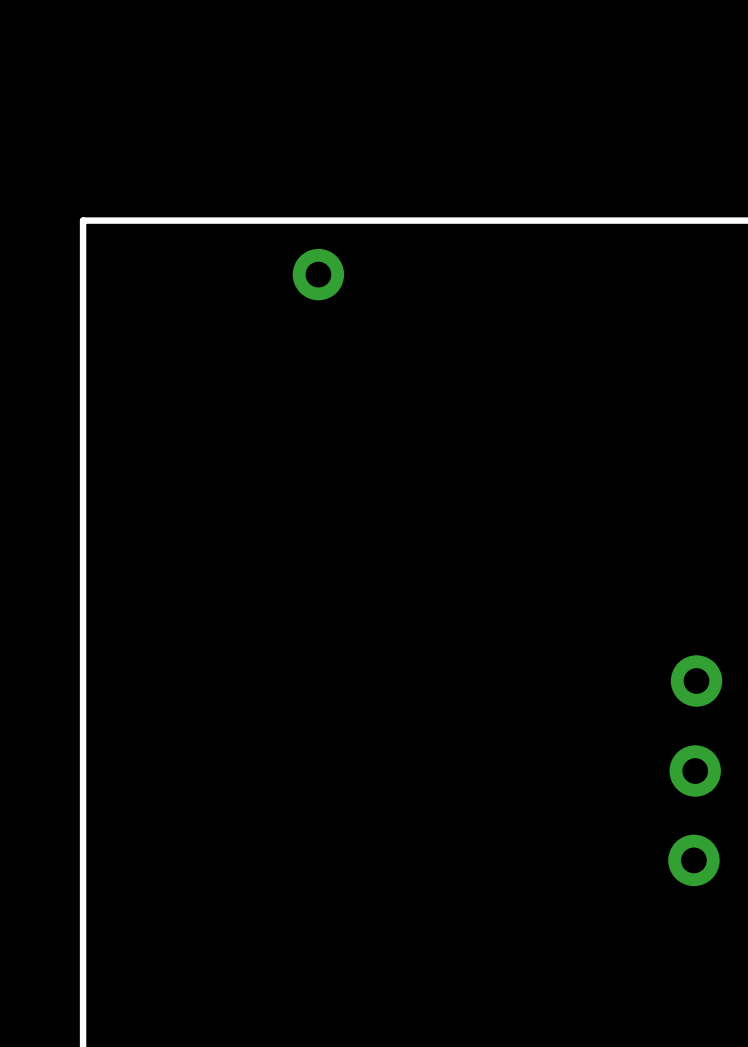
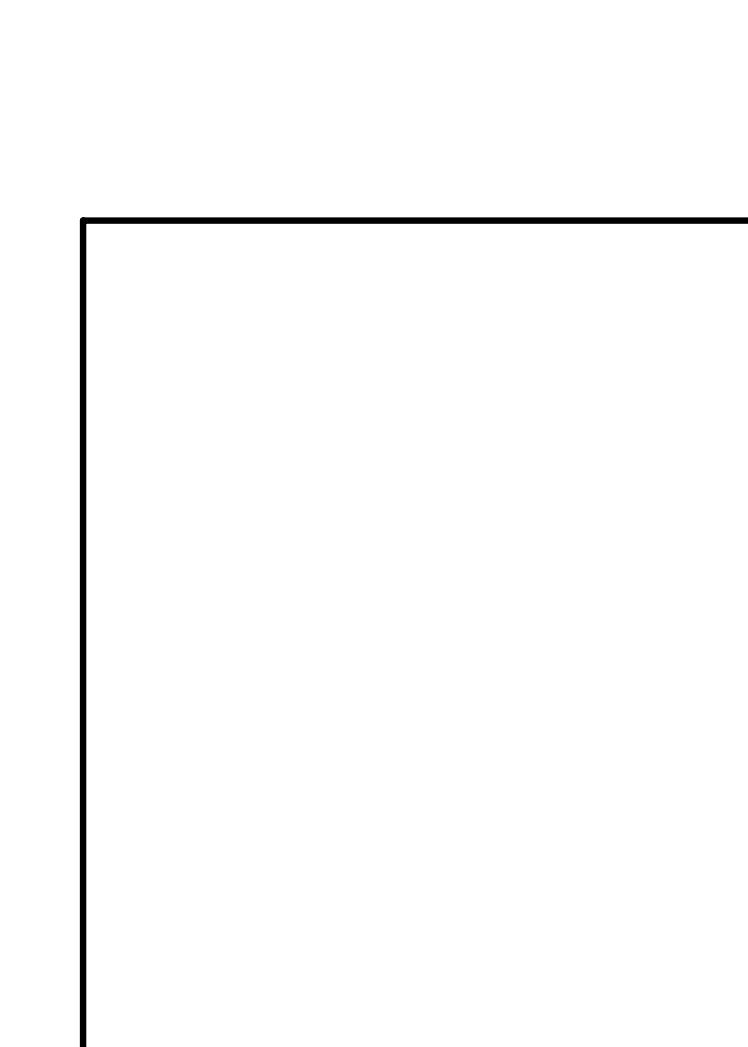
via: (318, 274) -> none
via: (696, 680) -> none
via: (695, 771) -> none
via: (693, 860) -> none

